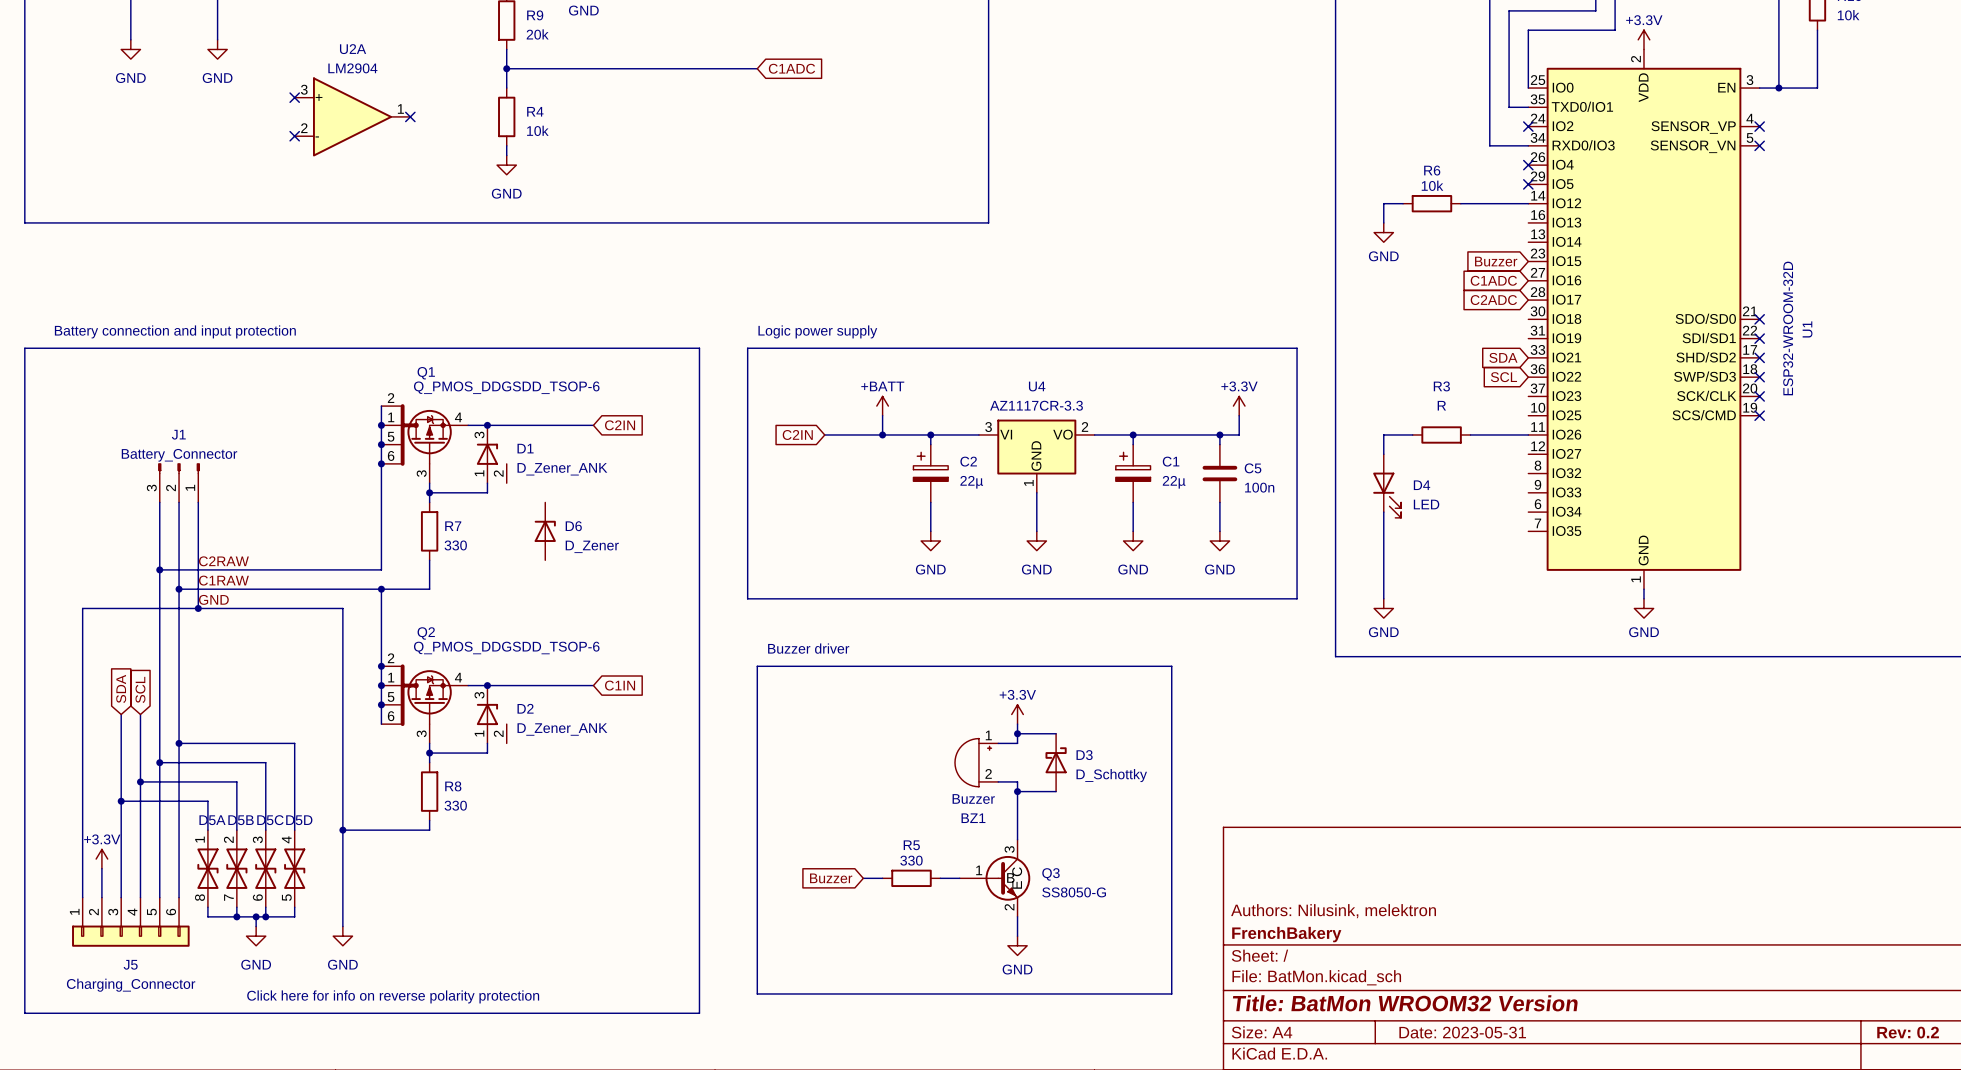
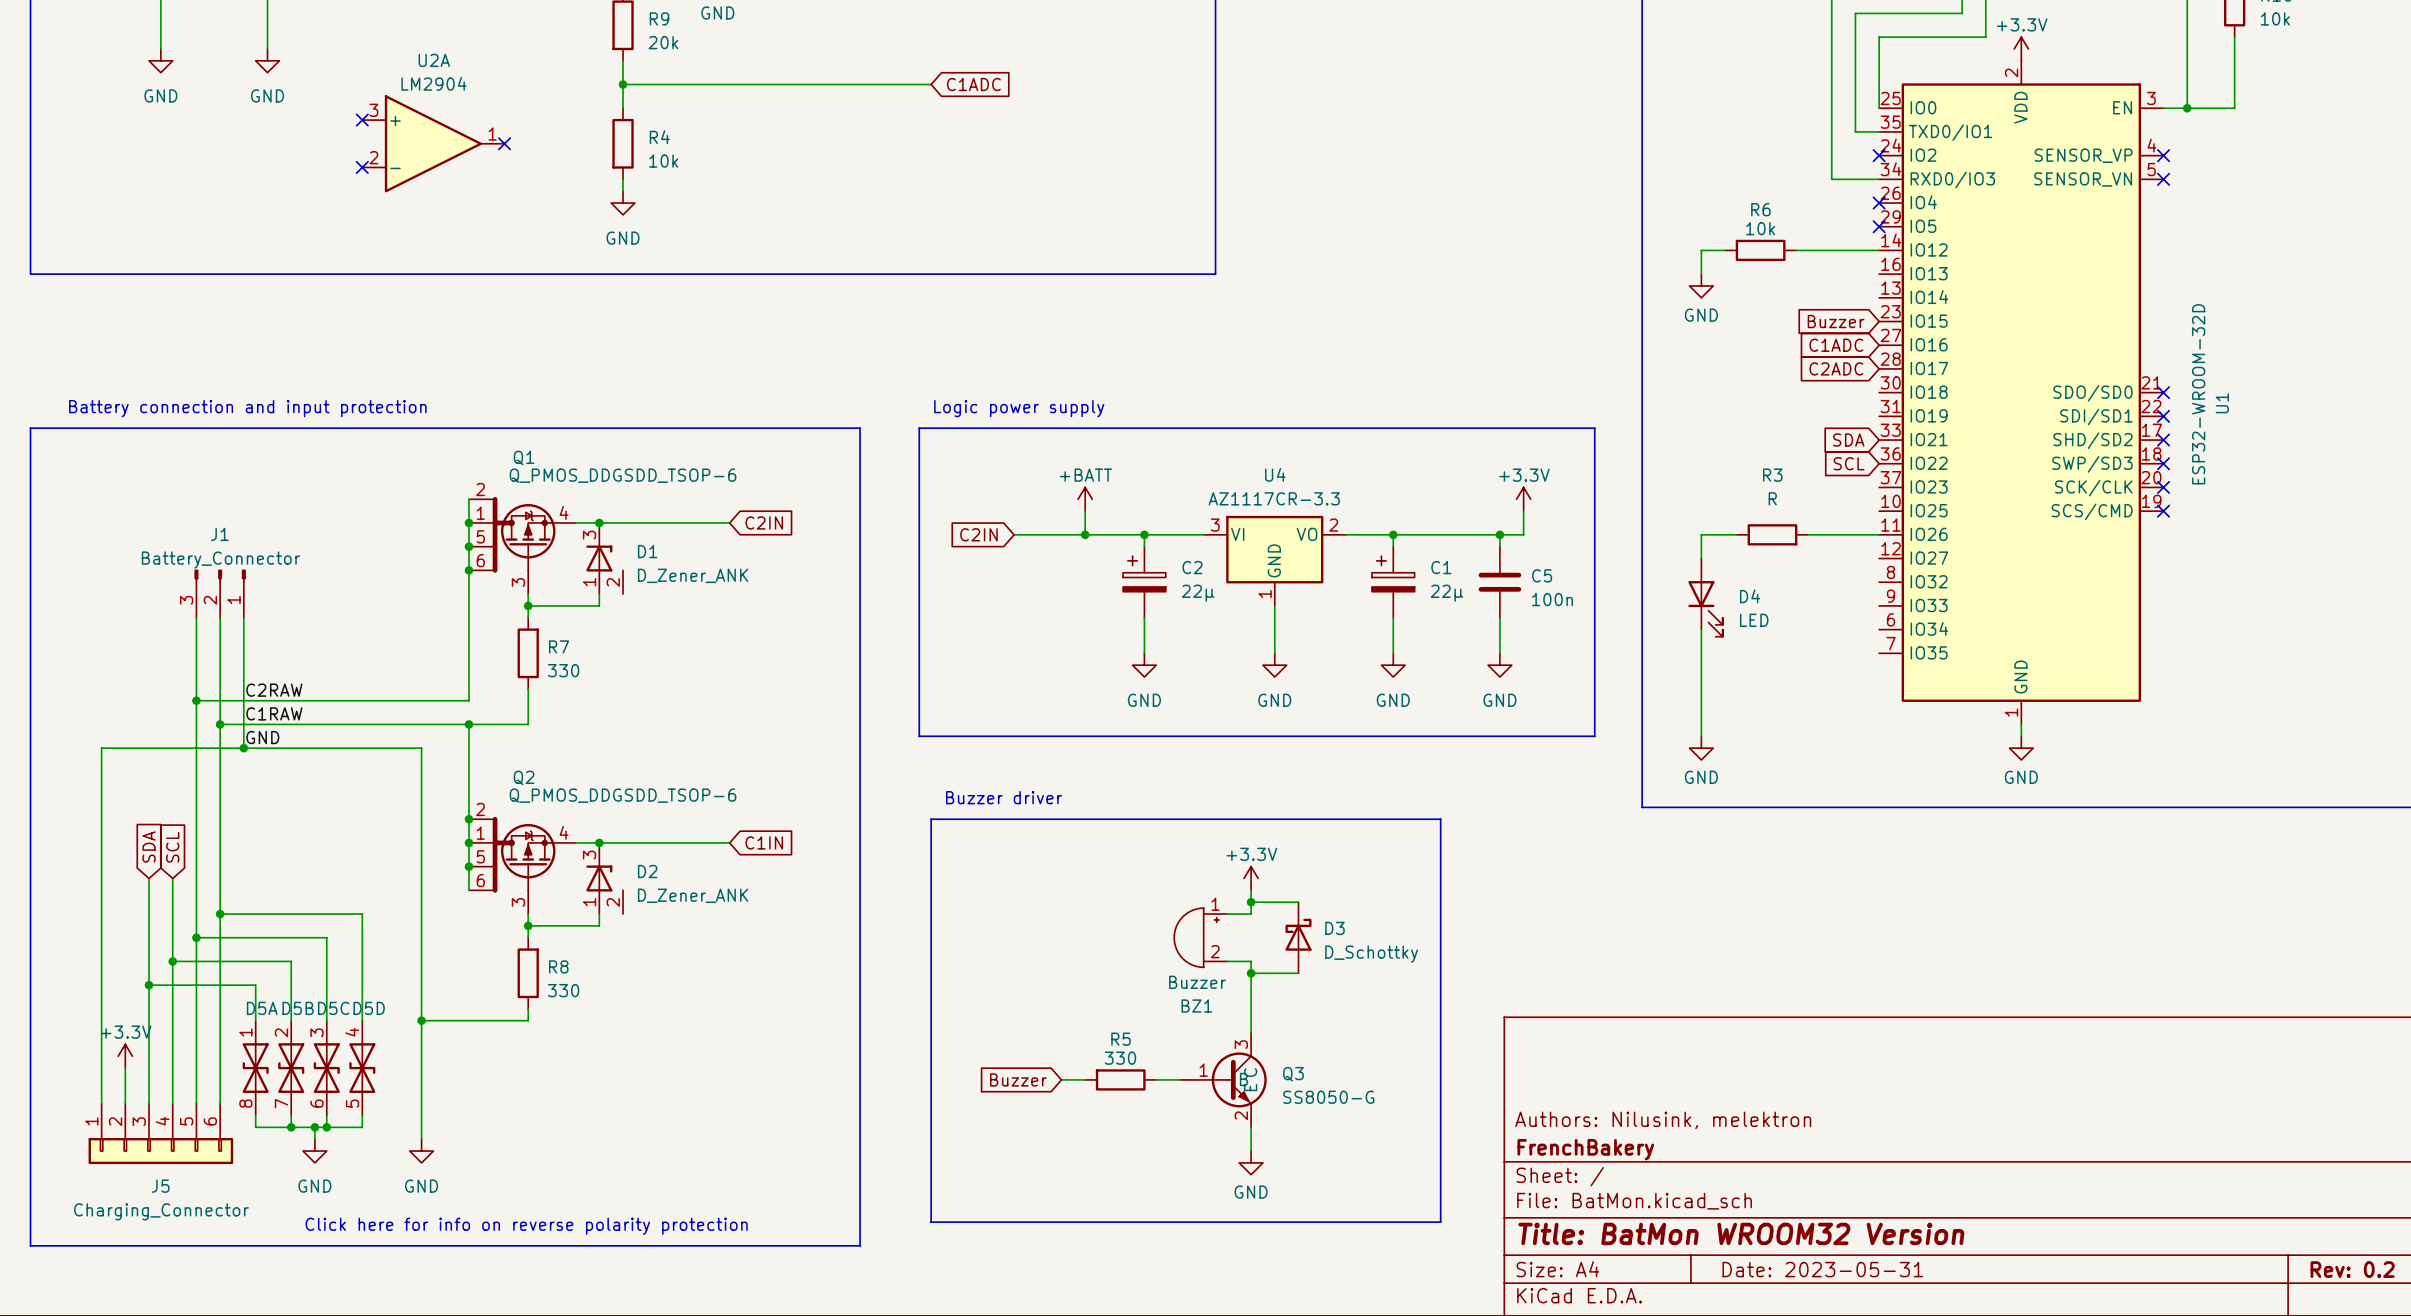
D6: D_Zener (545, 531) -> none

